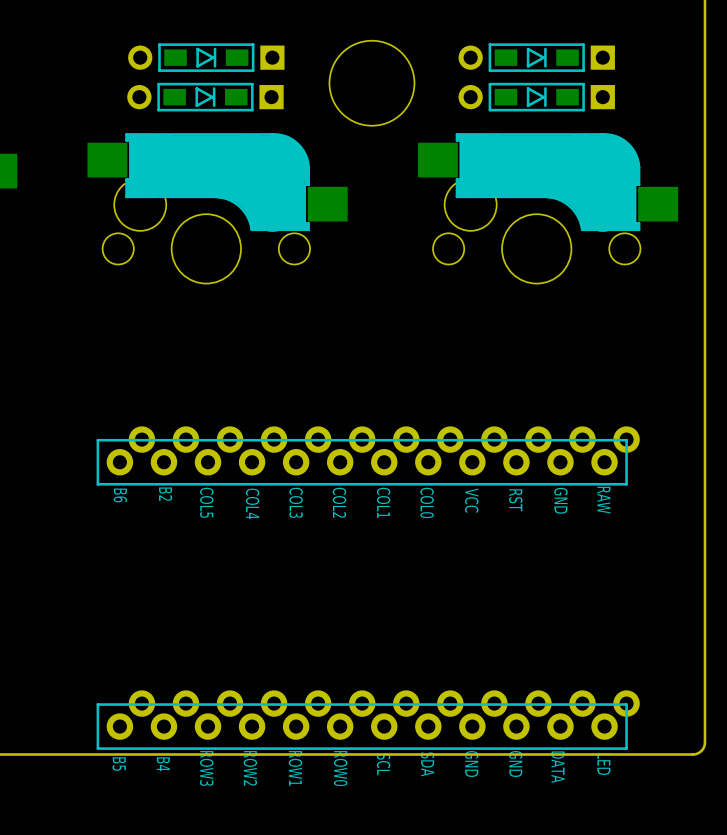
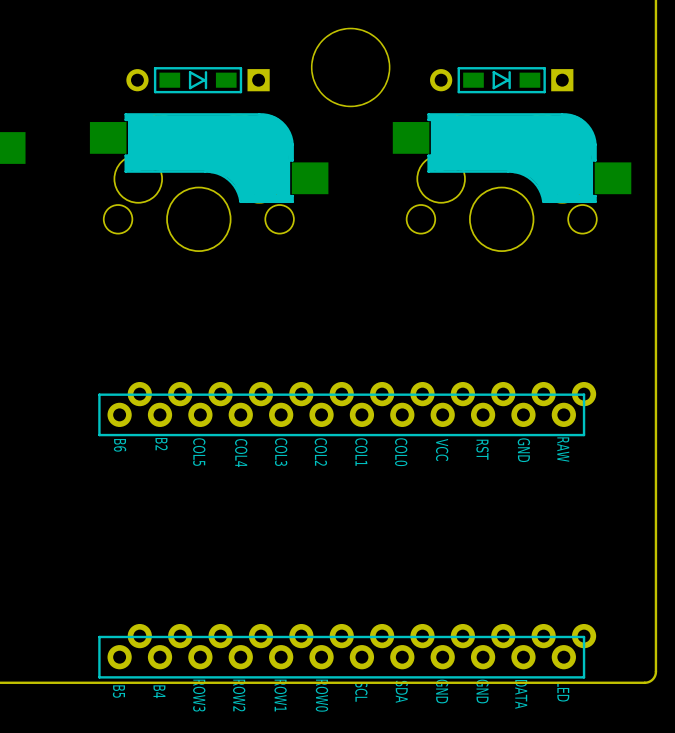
part: (206, 57) -> none
part: (536, 57) -> none

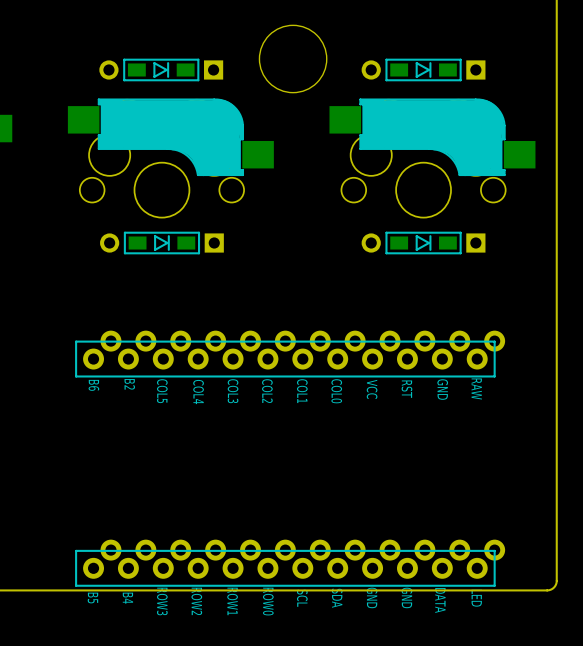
part: none -> (161, 243)
part: none -> (423, 243)

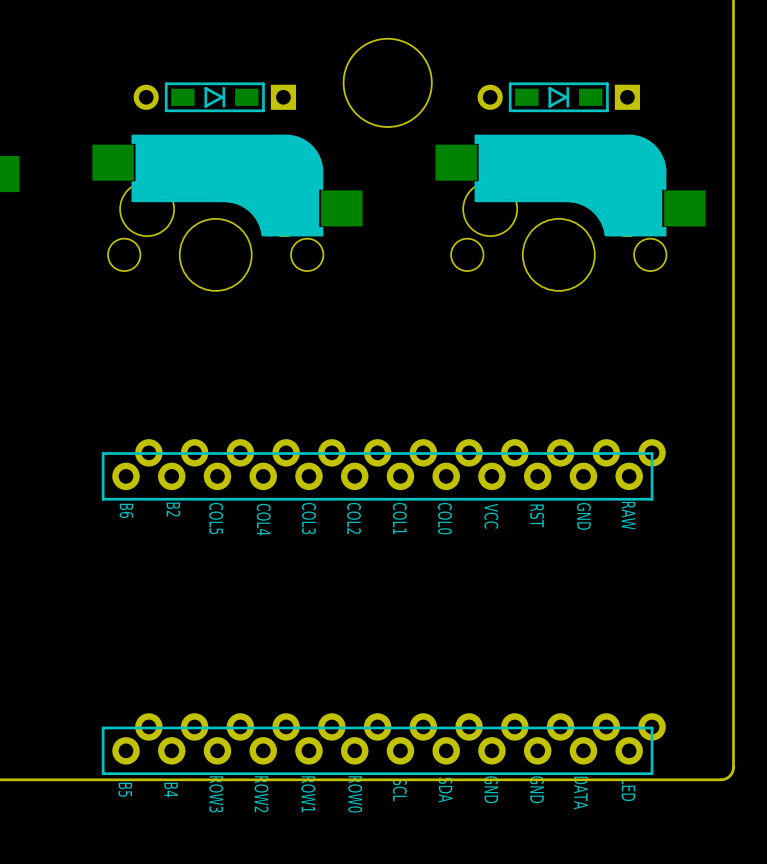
part: (161, 243) -> none
part: (423, 243) -> none

